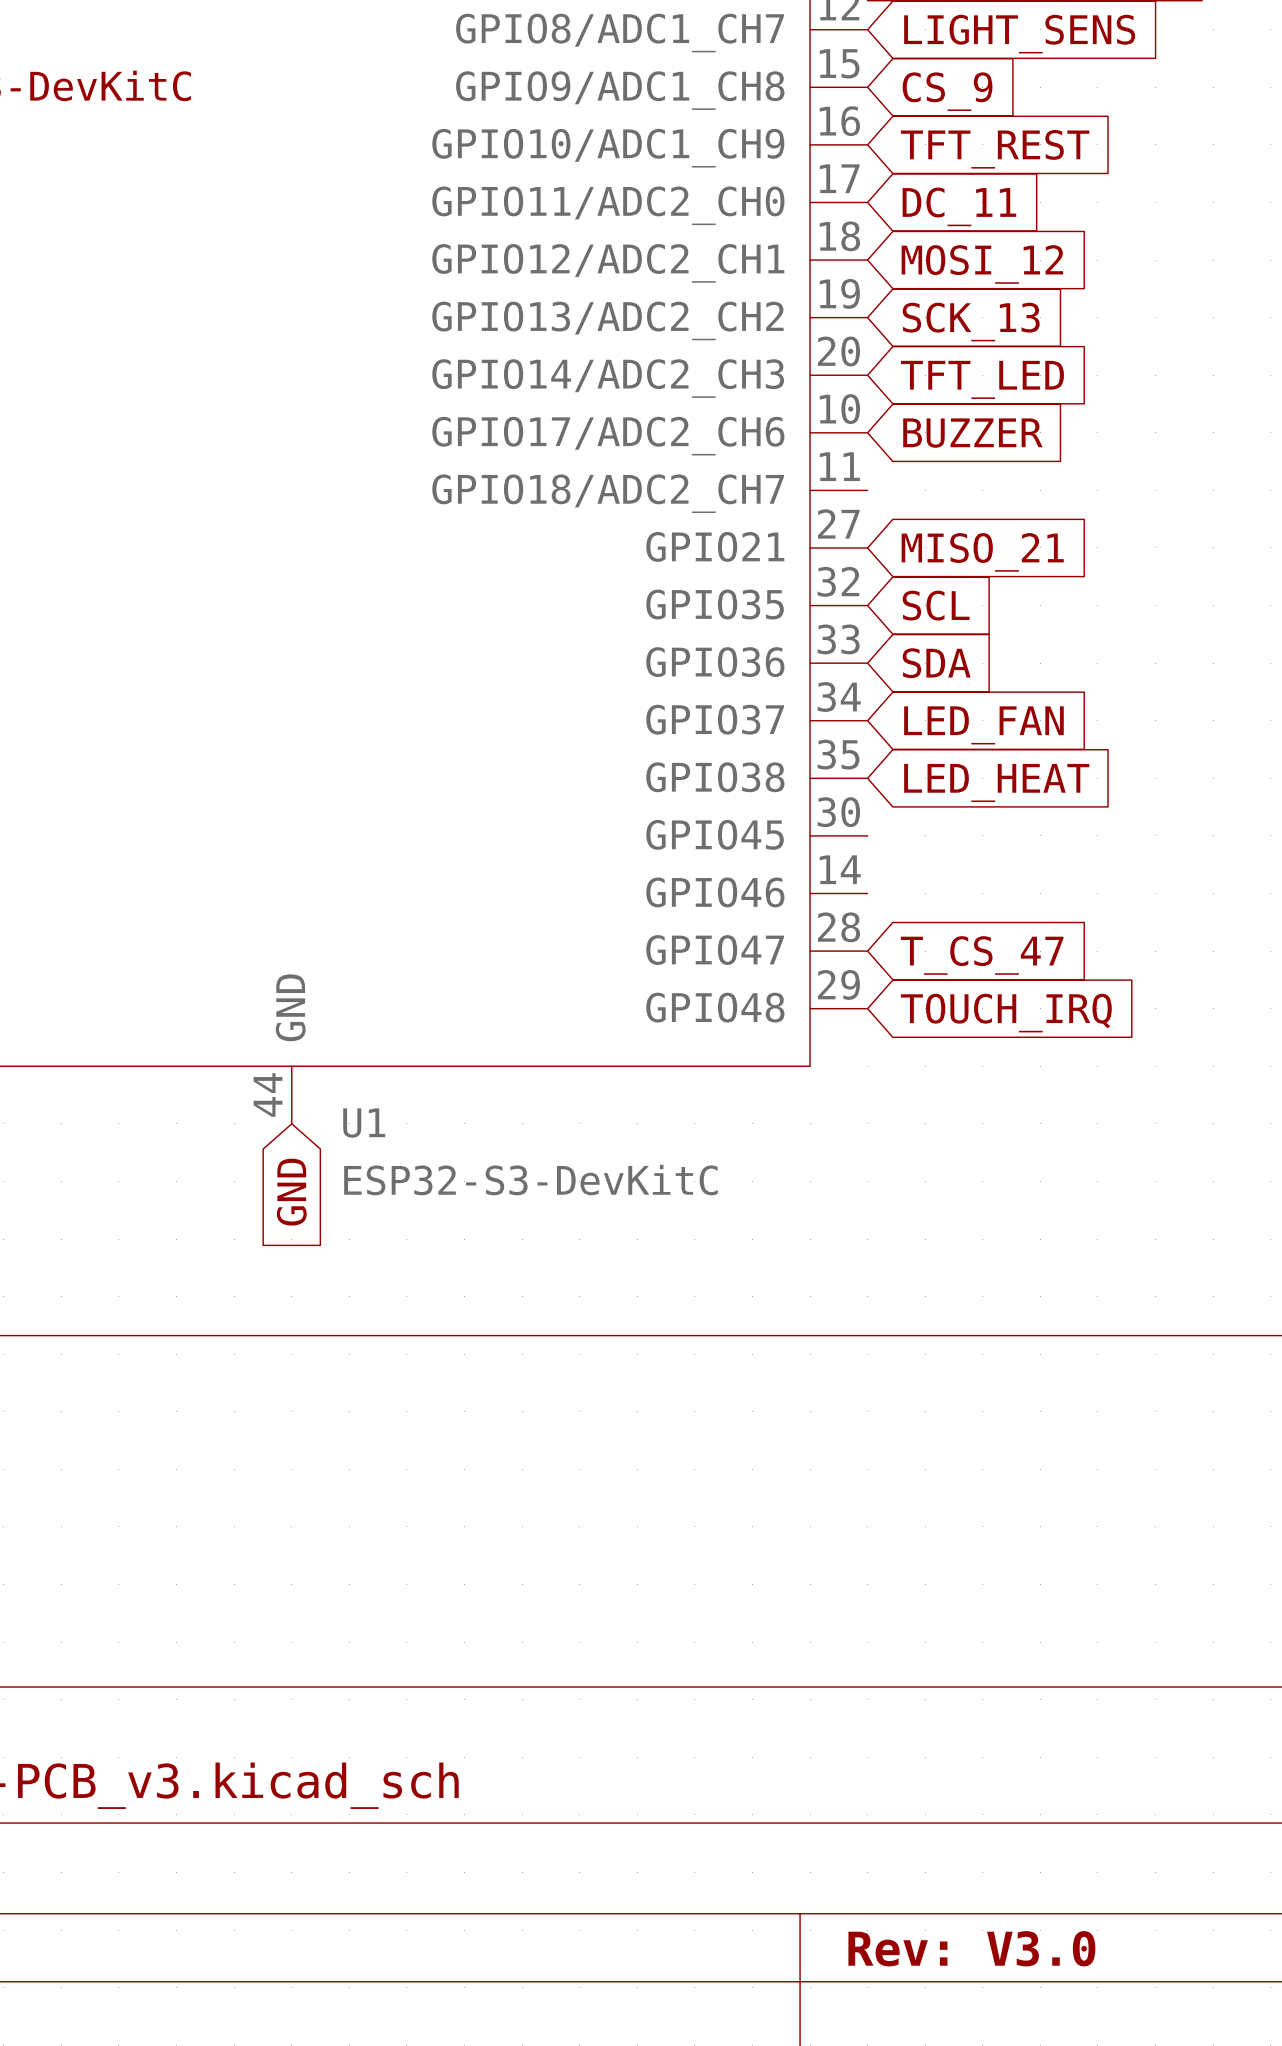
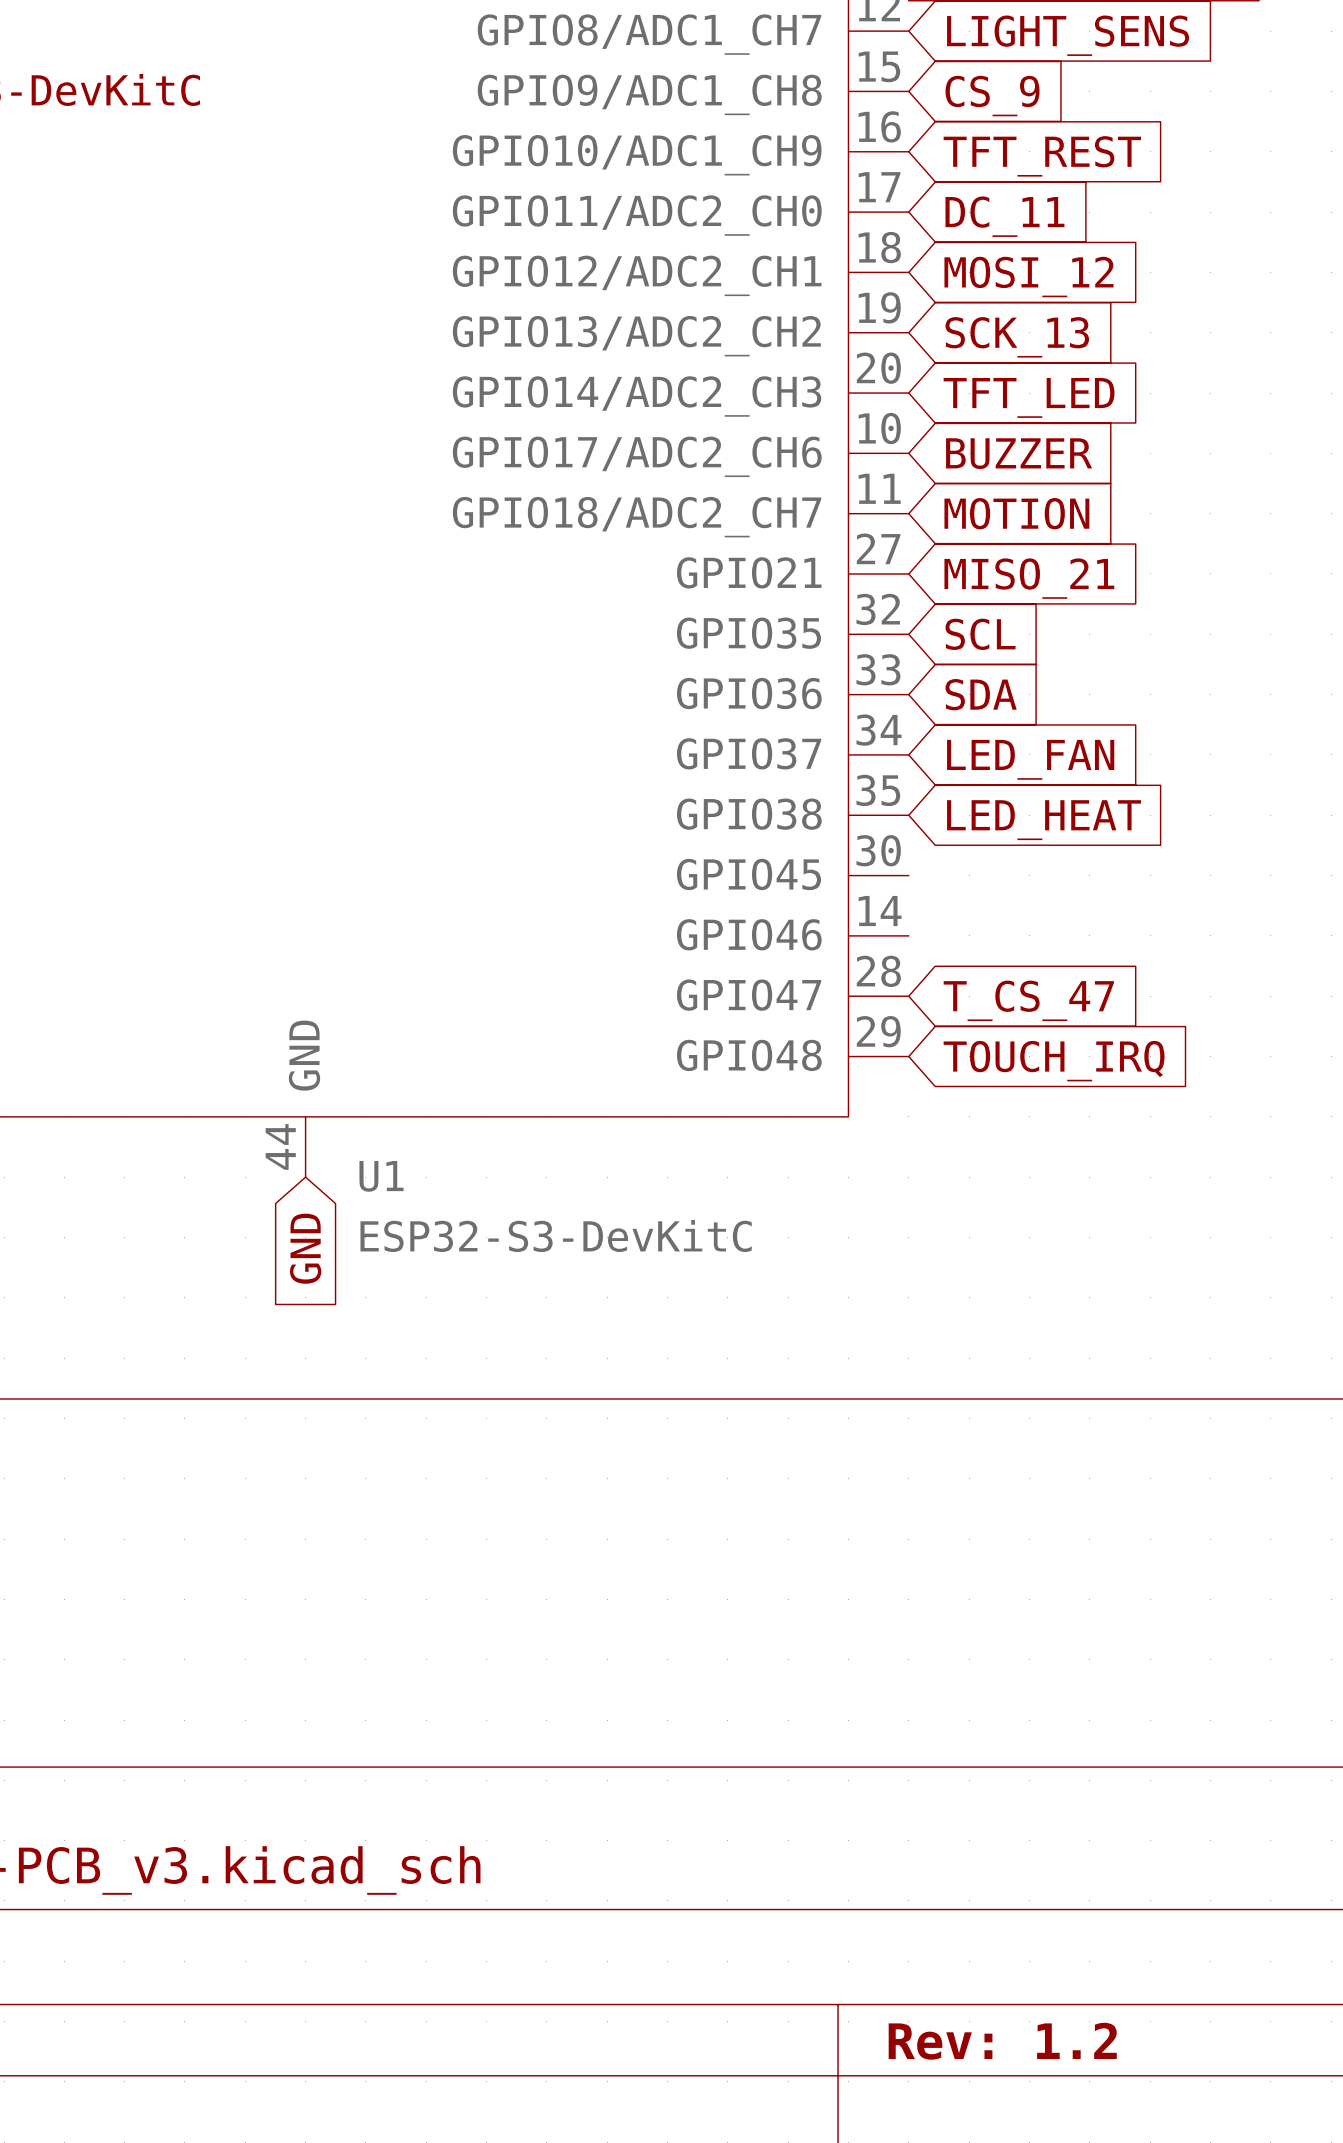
global label: none -> MOTION (1016, 513)
title block: Rev: V3.0 (971, 1948) -> Rev: 1.2 (1002, 2041)

